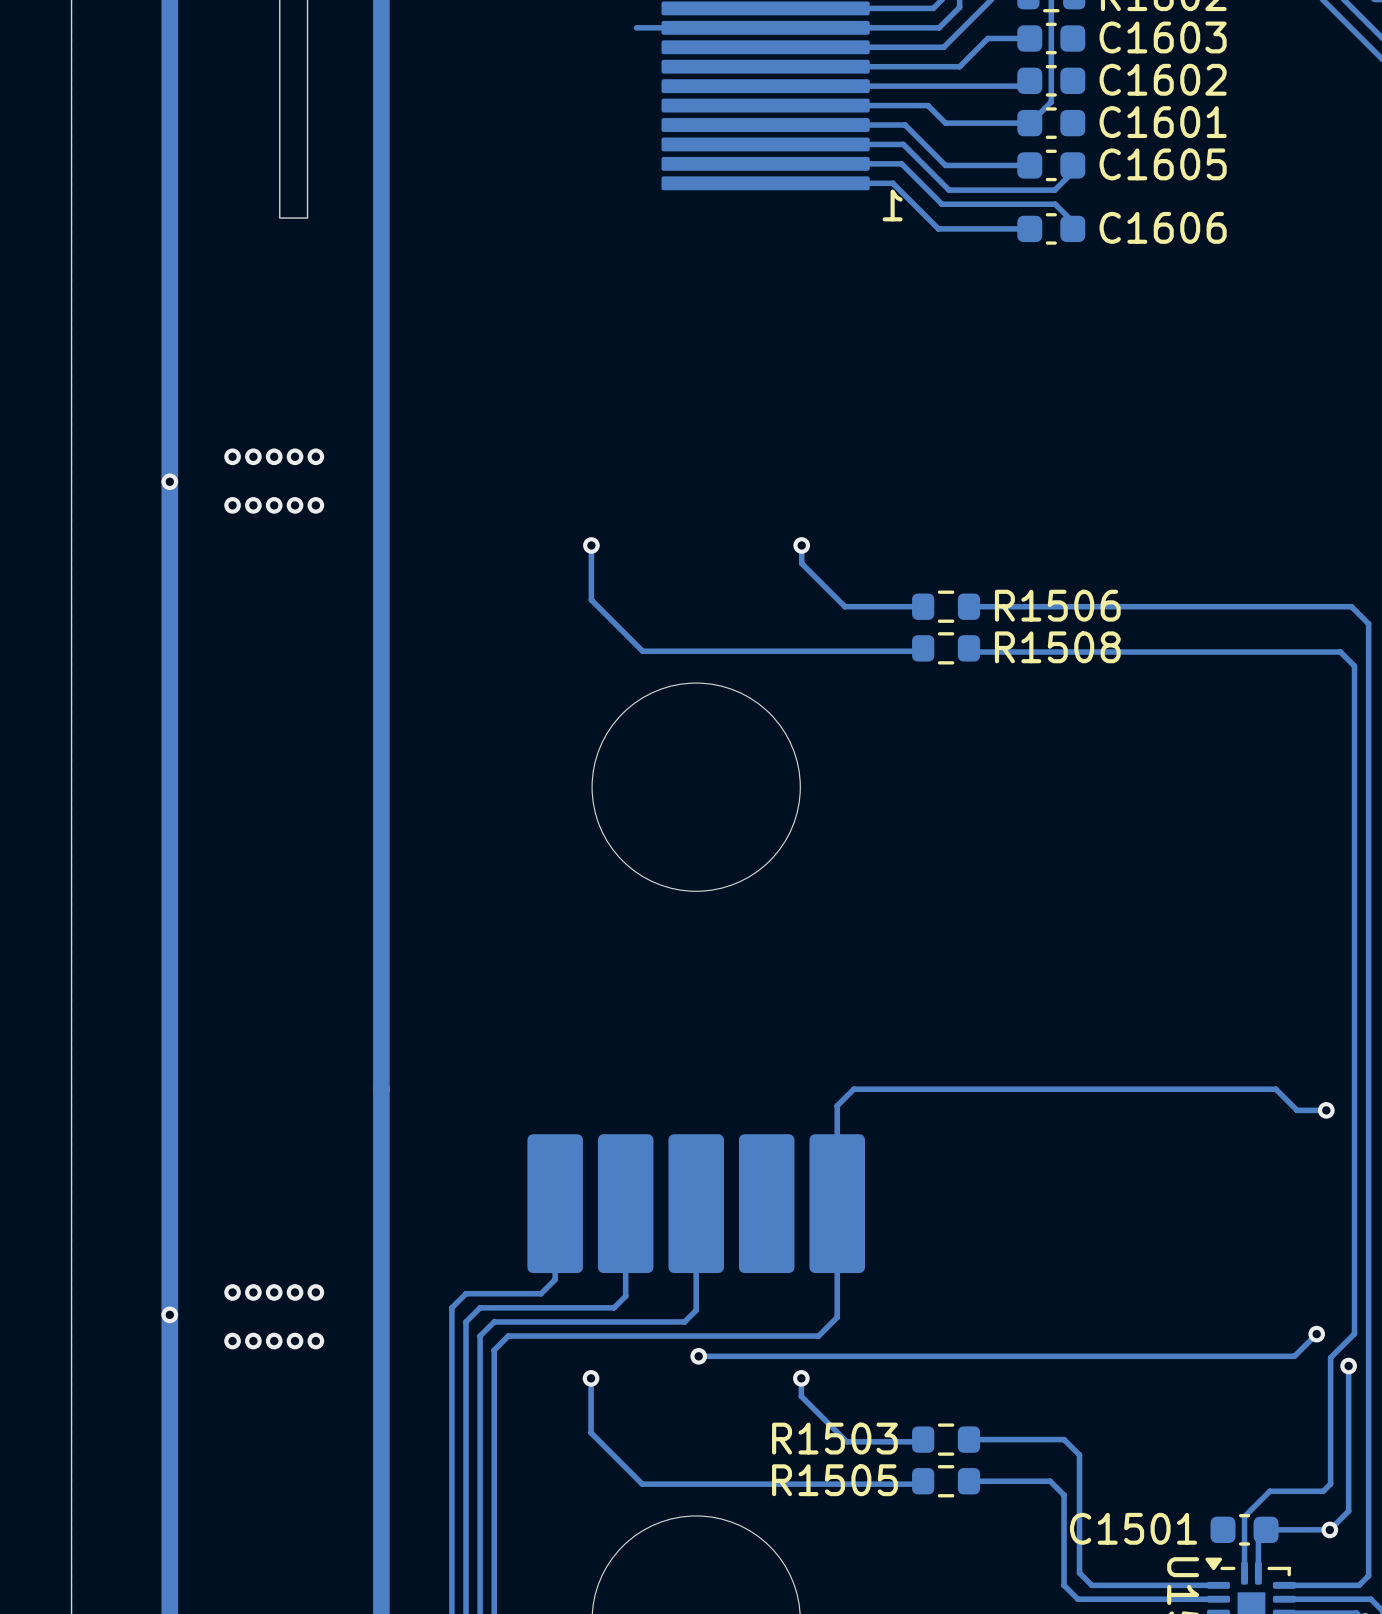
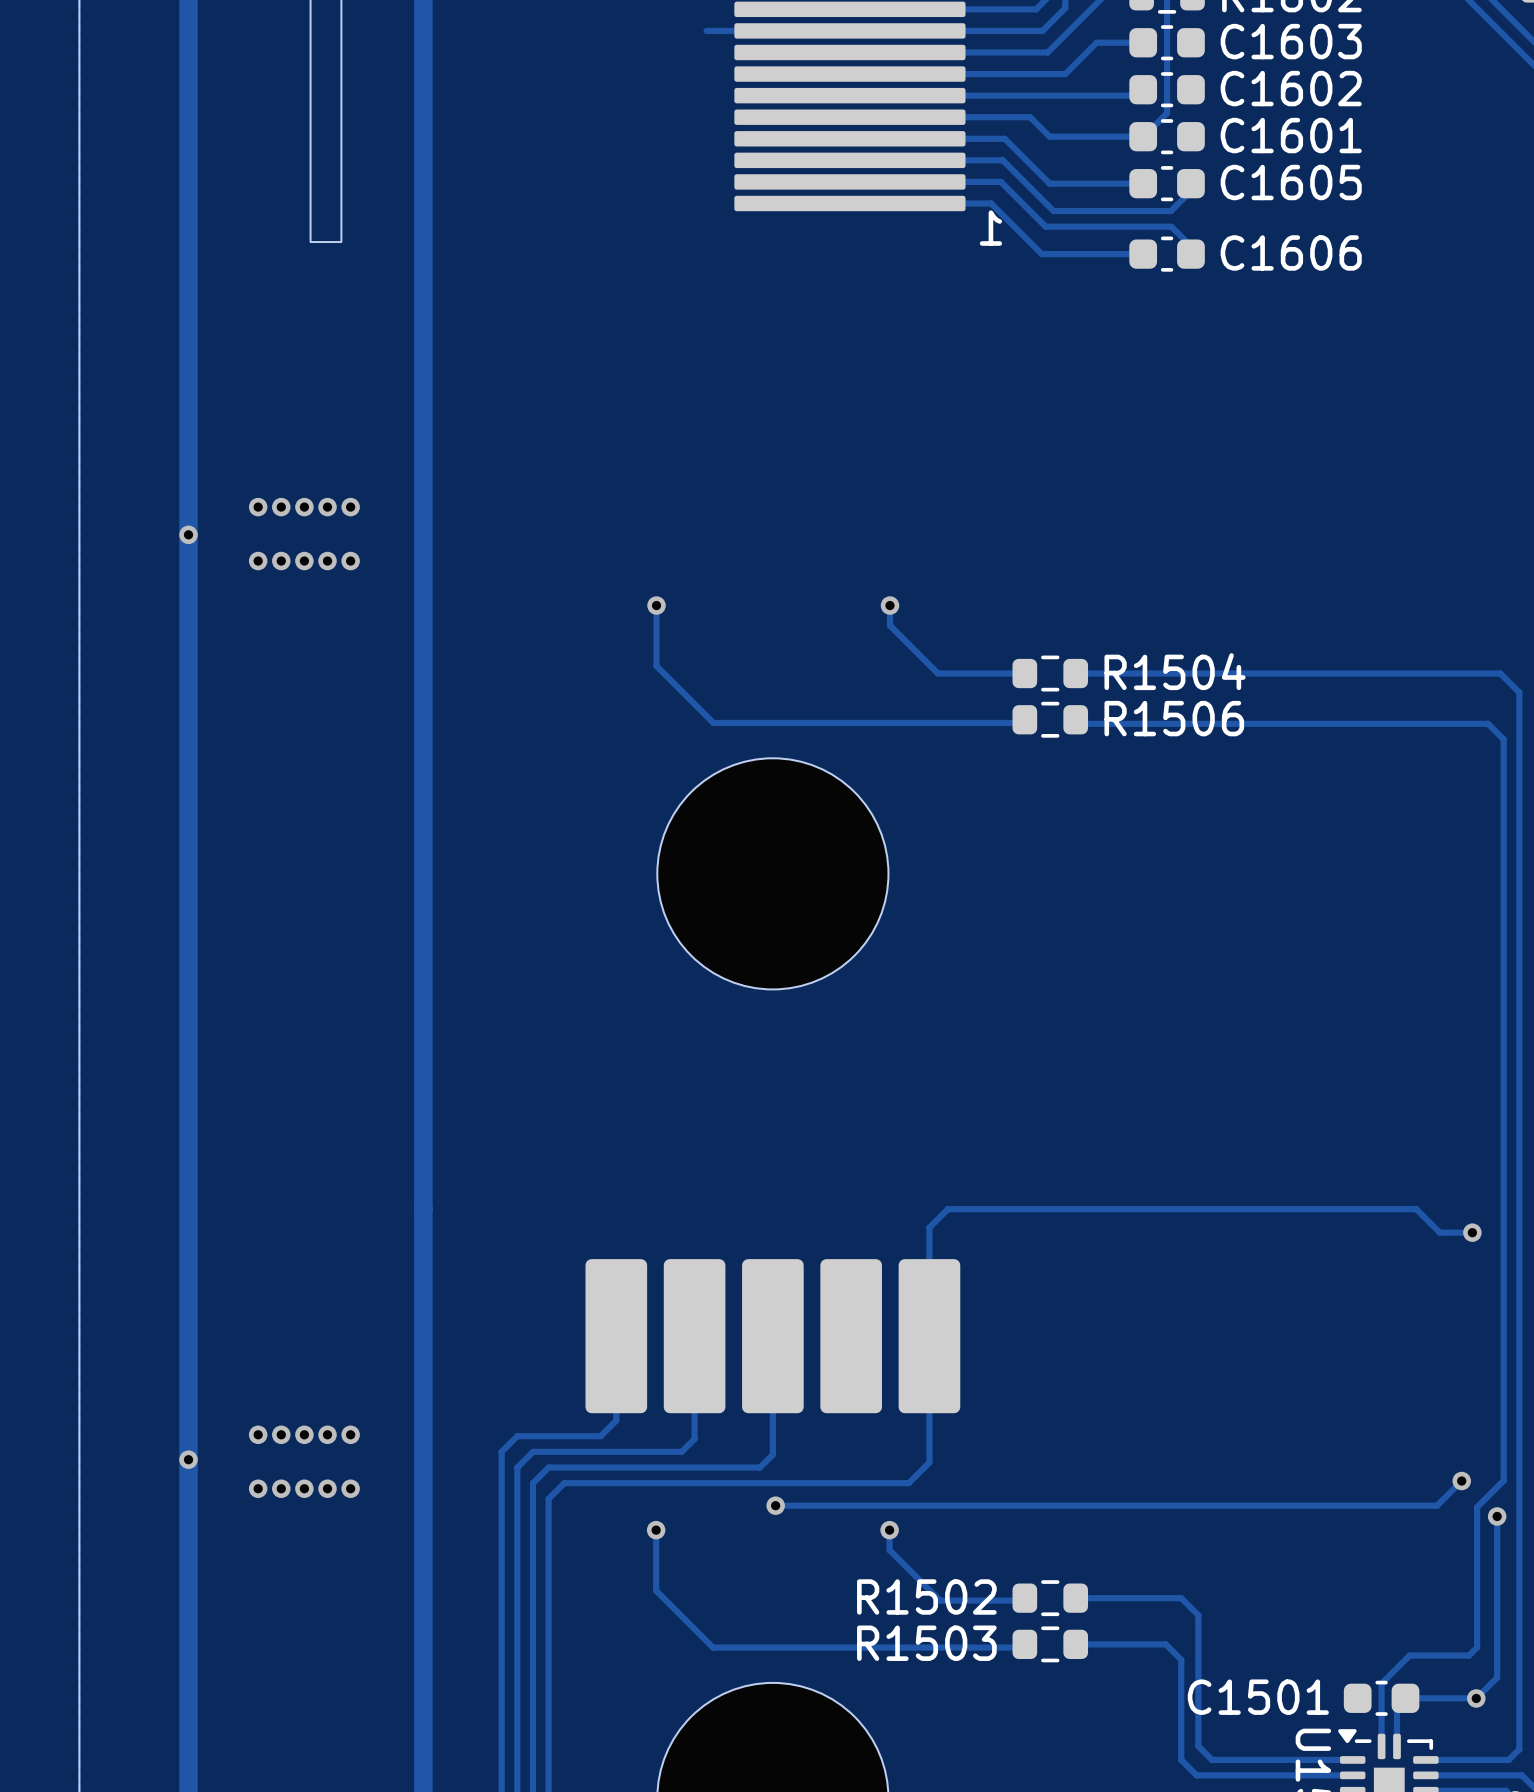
R1506 name: R1506 (1057, 605) -> R1504 (1175, 671)
R1508 name: R1508 (1057, 647) -> R1506 (1174, 718)
R1503 name: R1503 (834, 1438) -> R1502 (926, 1596)
R1505 name: R1505 (834, 1480) -> R1503 (926, 1643)

